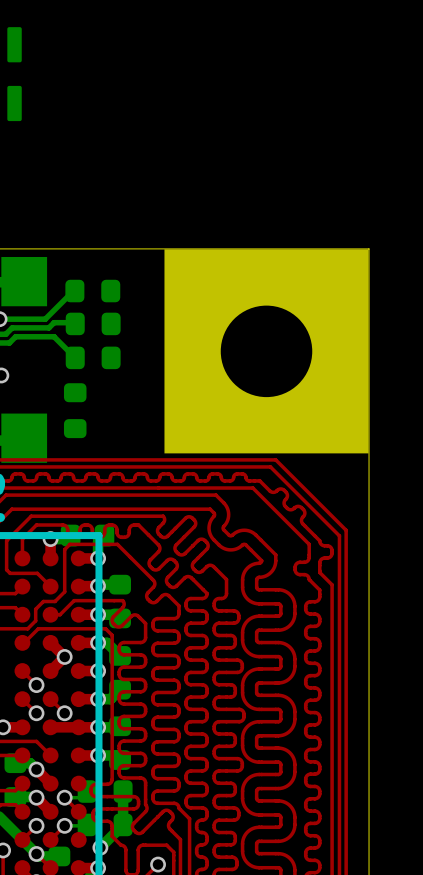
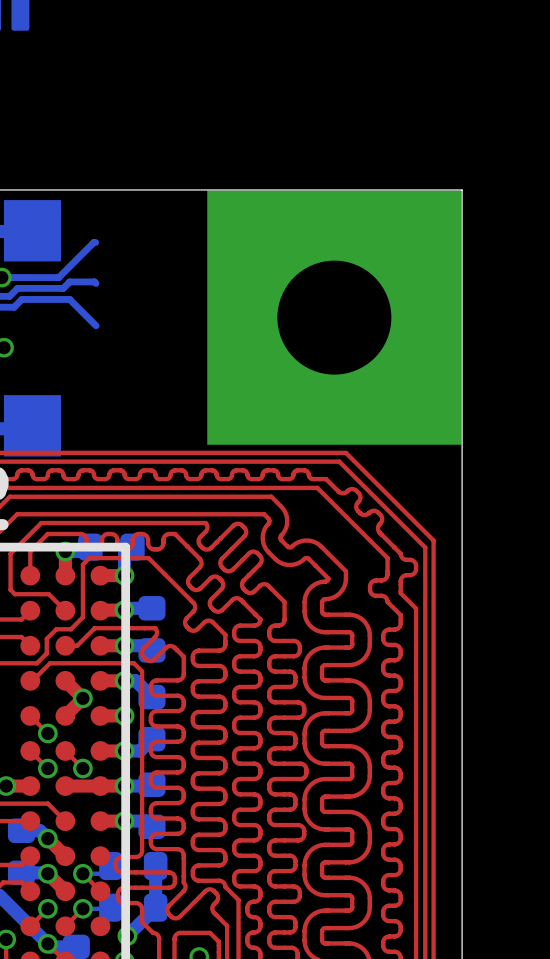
part: (92, 291) -> none
part: (93, 323) -> none
part: (93, 357) -> none
part: (75, 410) -> none

